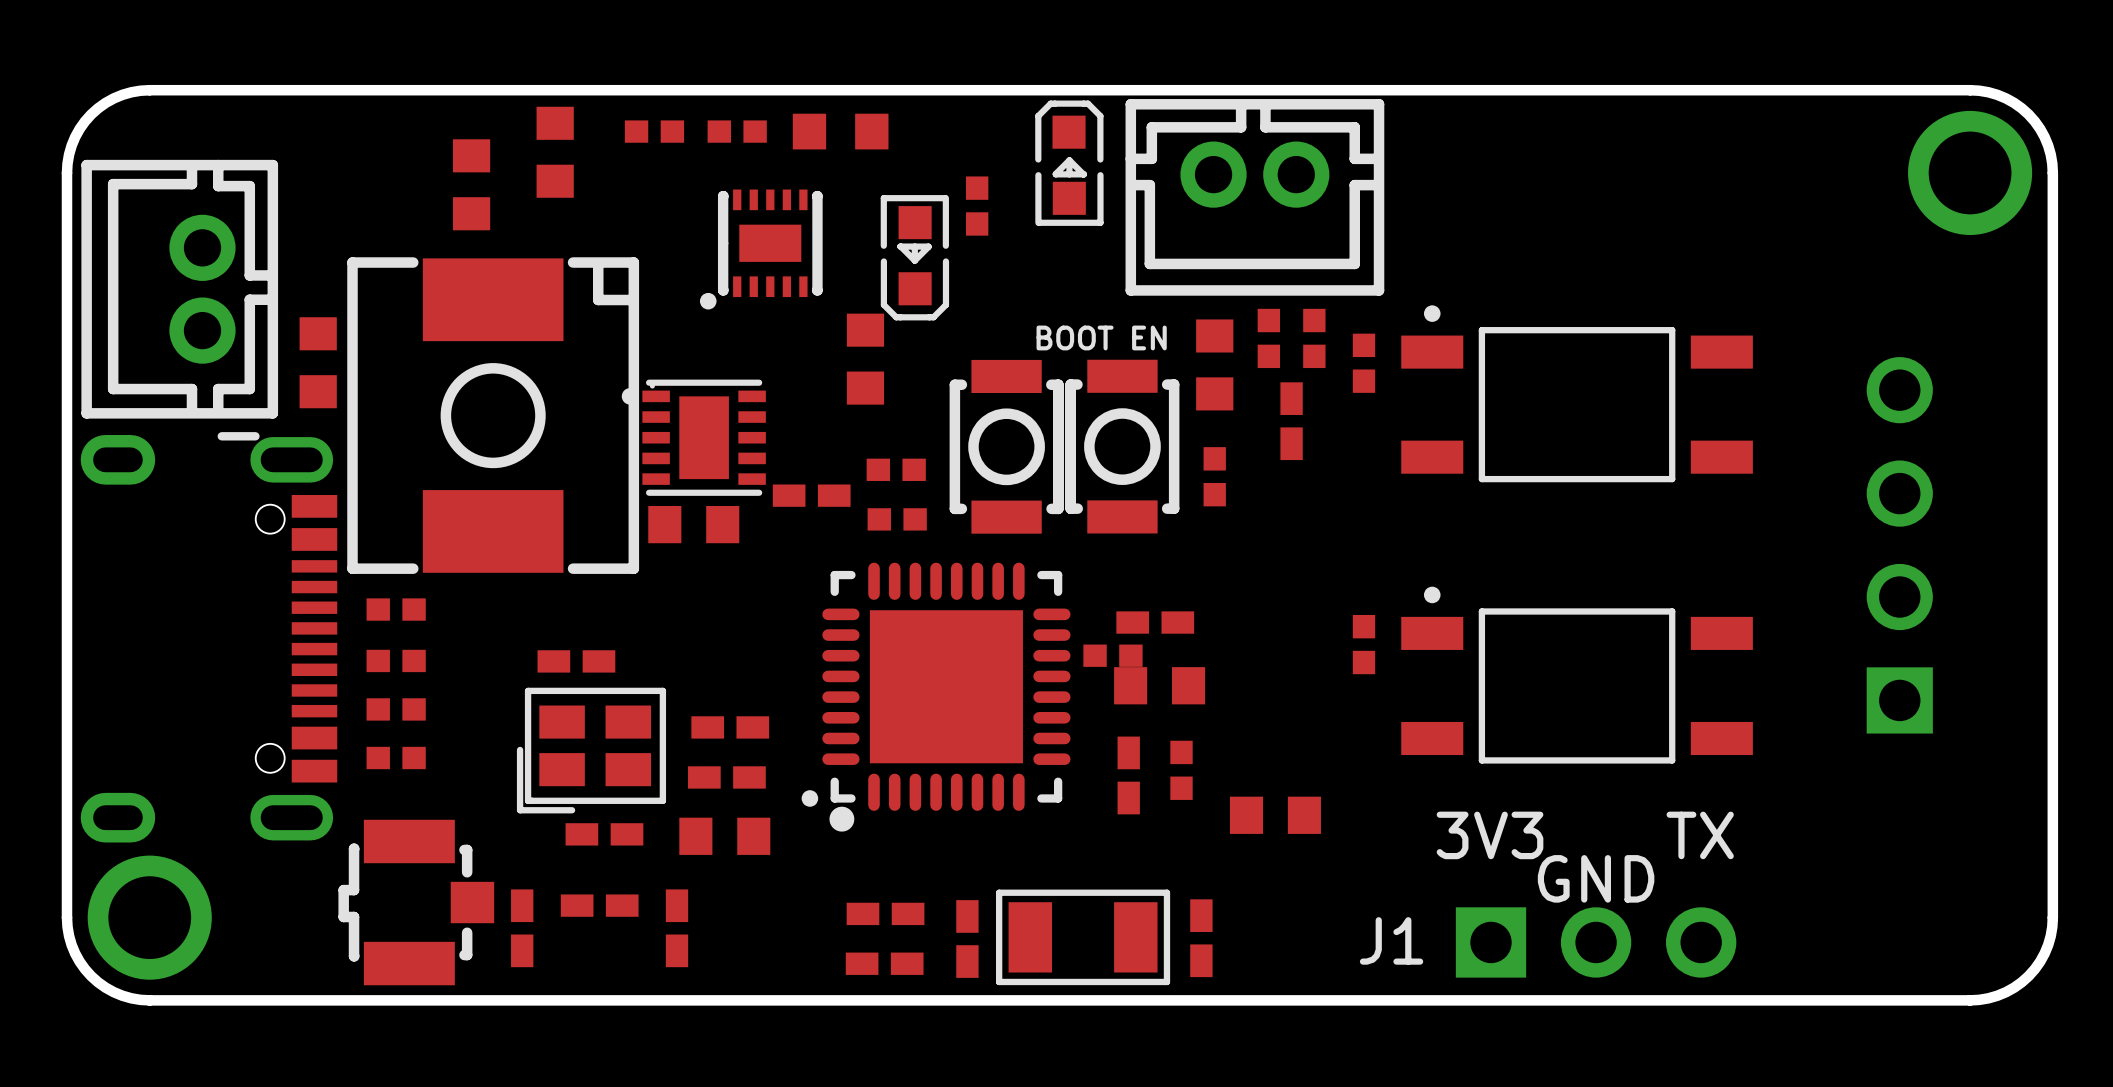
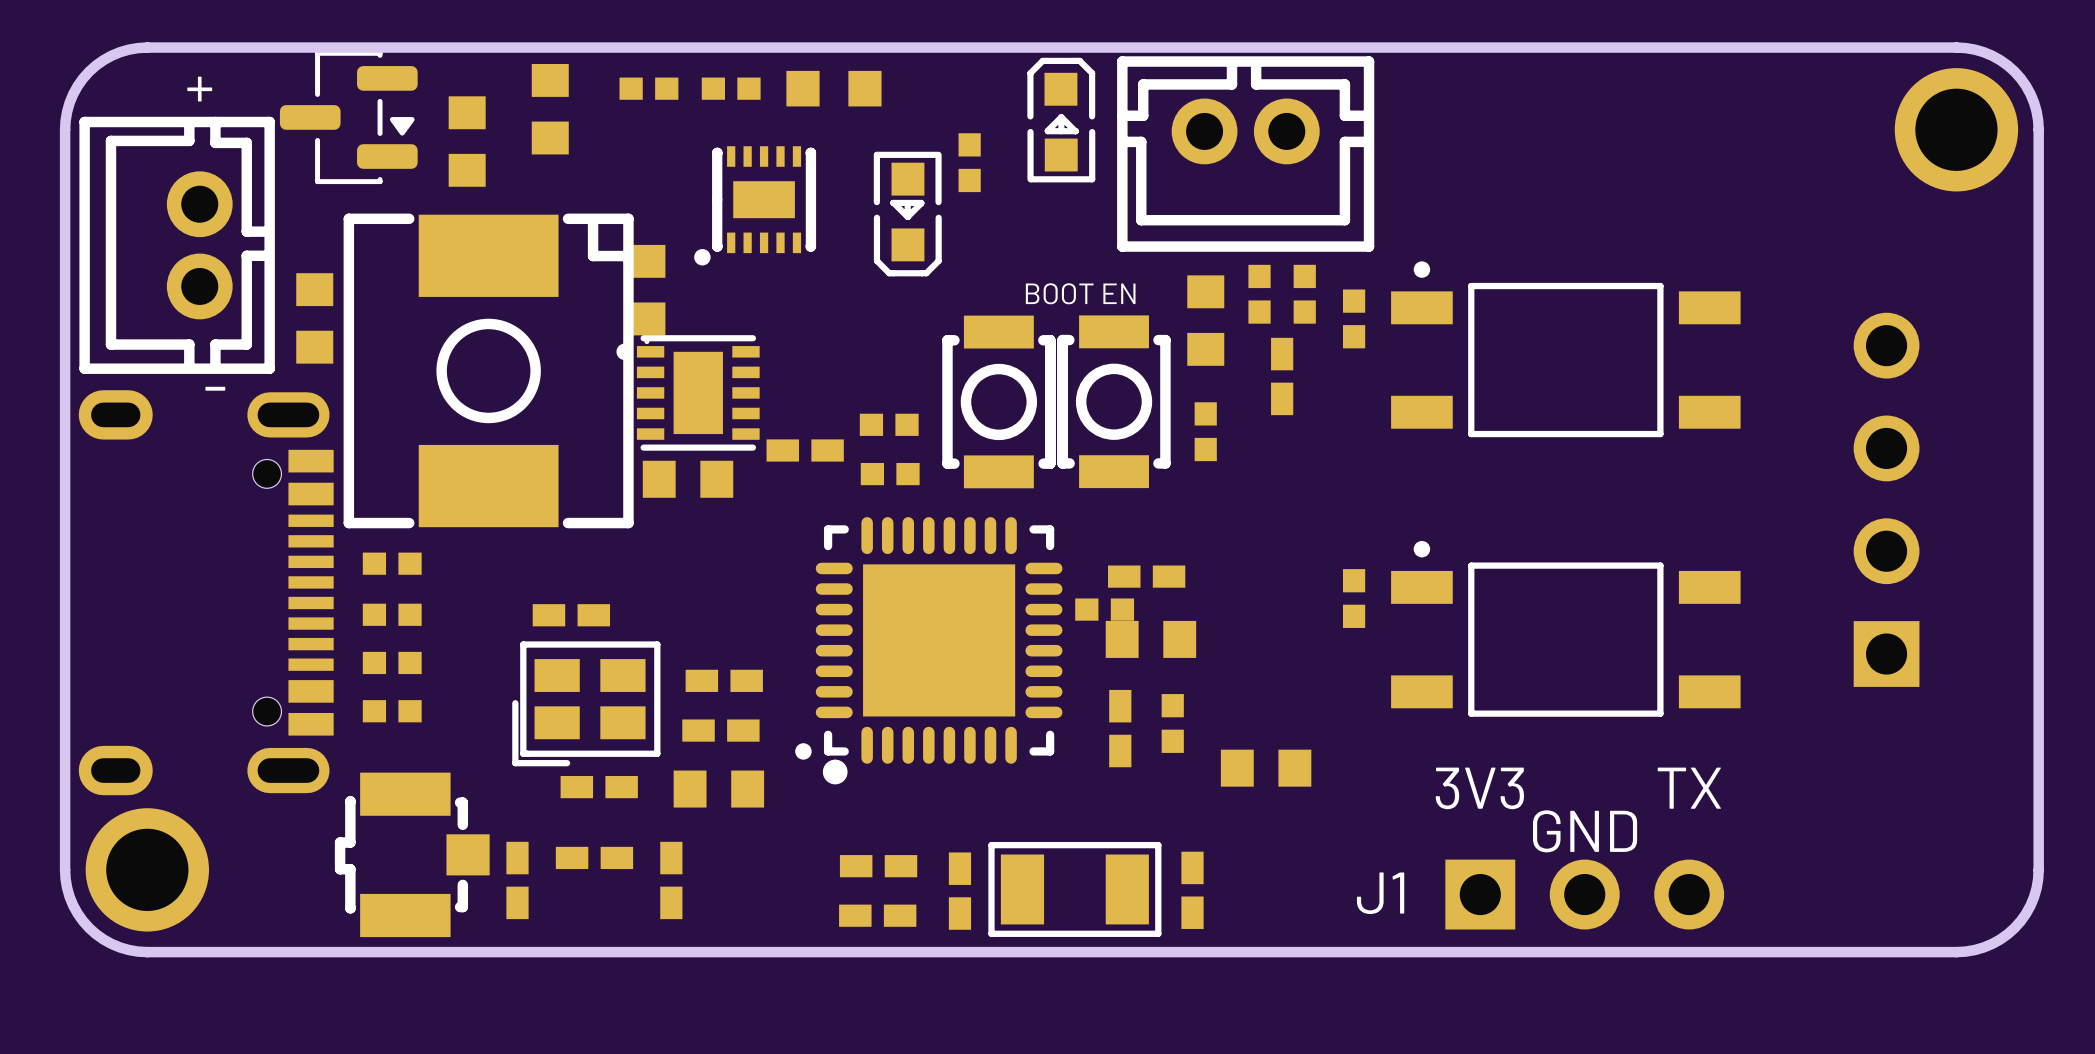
text: none -> + (199, 89)
part: none -> (348, 117)
part position: (865, 359) -> (646, 290)

